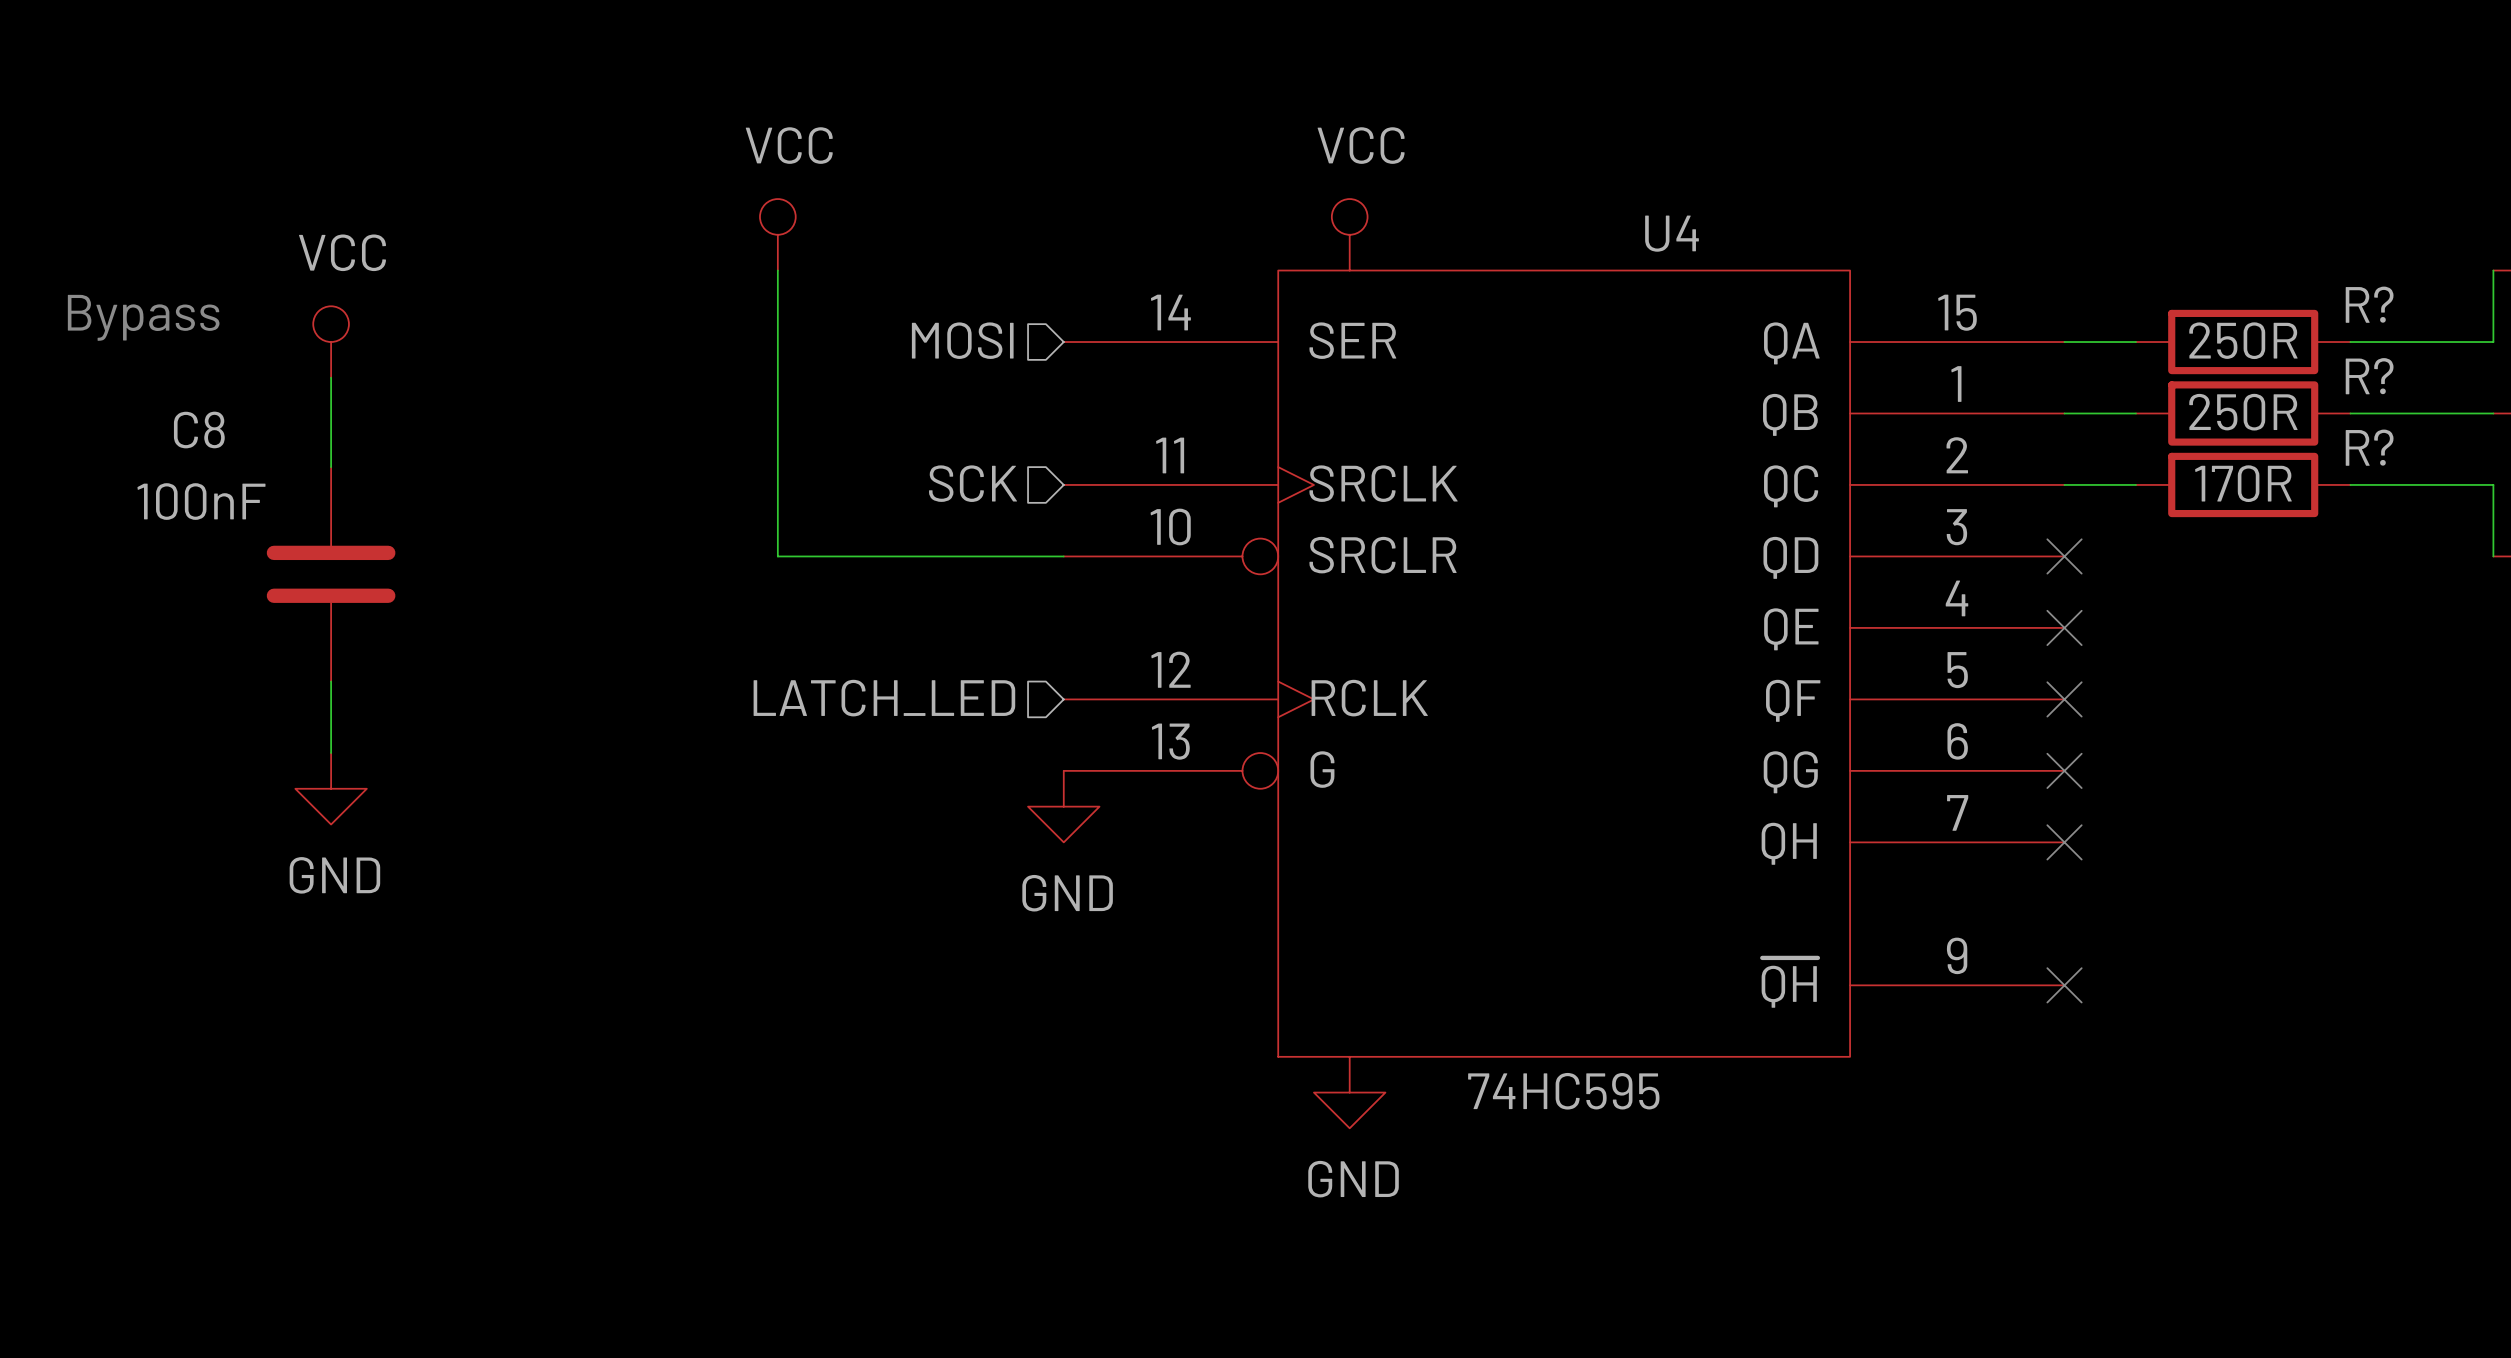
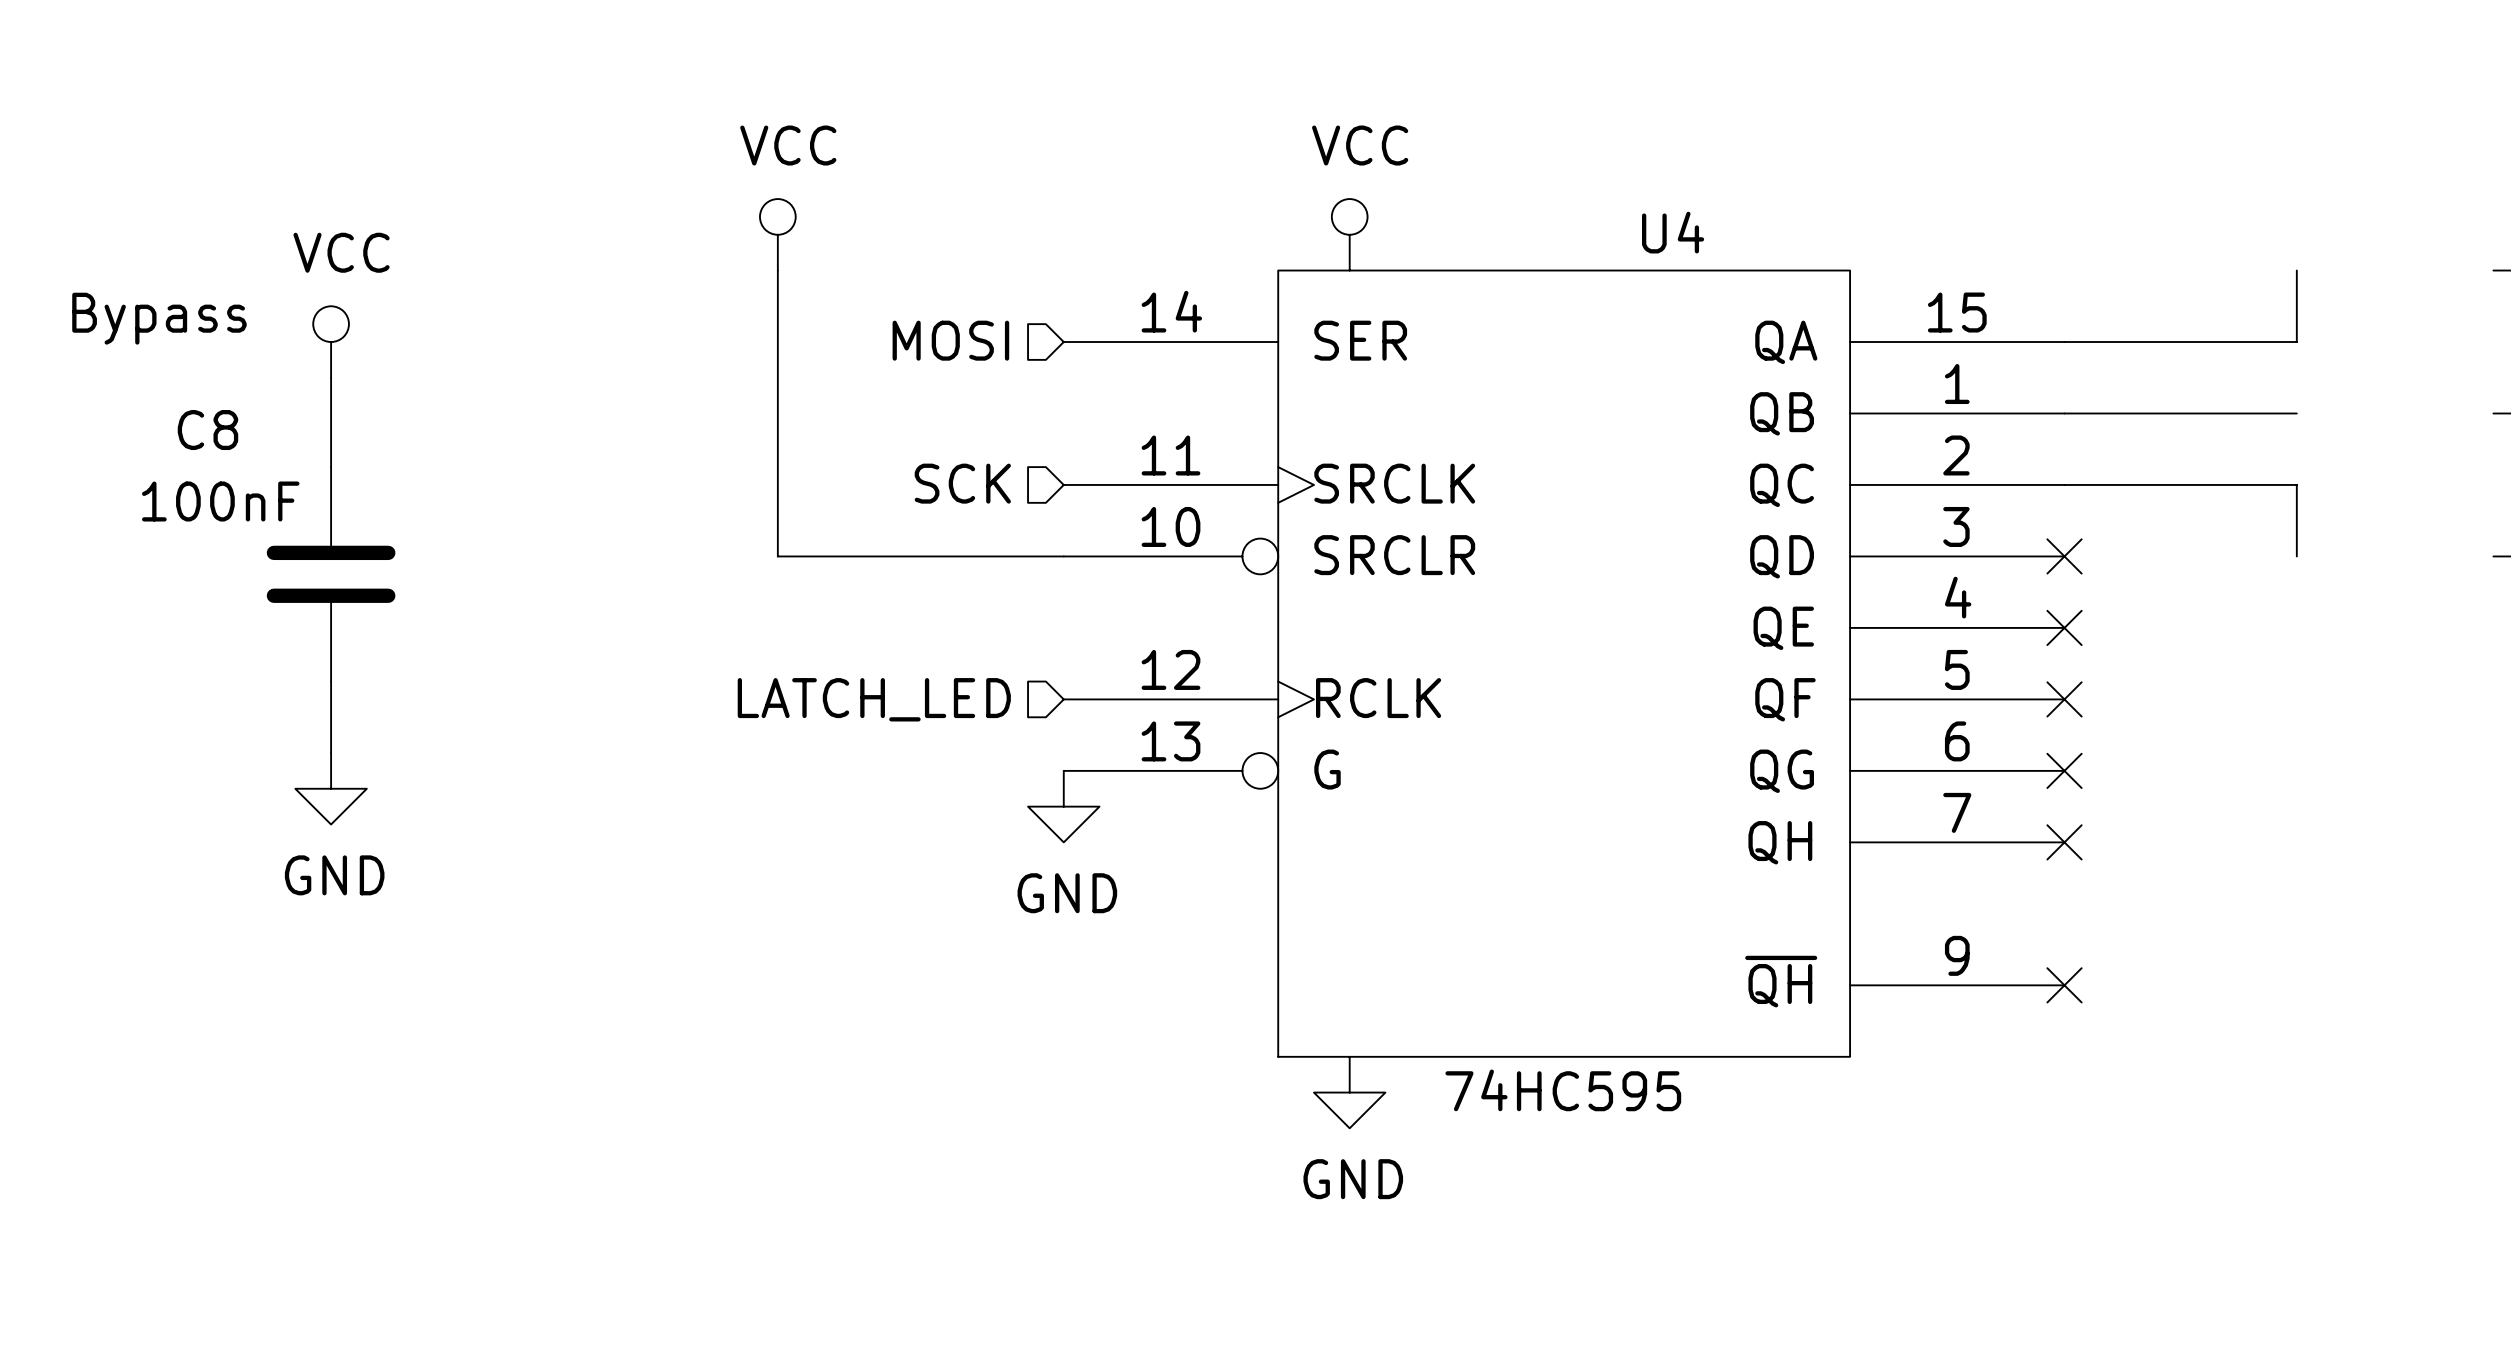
wire: none -> (2296, 270) (2296, 342) (2135, 342)
wire: (2493, 270) (2493, 342) (2350, 342) -> none
R?: 250R (2243, 342) -> none
wire: none -> (2135, 413) (2296, 413)
R?: 250R (2243, 413) -> none
wire: (2350, 413) (2493, 413) -> none
wire: none -> (2135, 484) (2296, 484) (2296, 556)
R?: 170R (2243, 484) -> none
wire: (2350, 484) (2493, 484) (2493, 556) -> none

